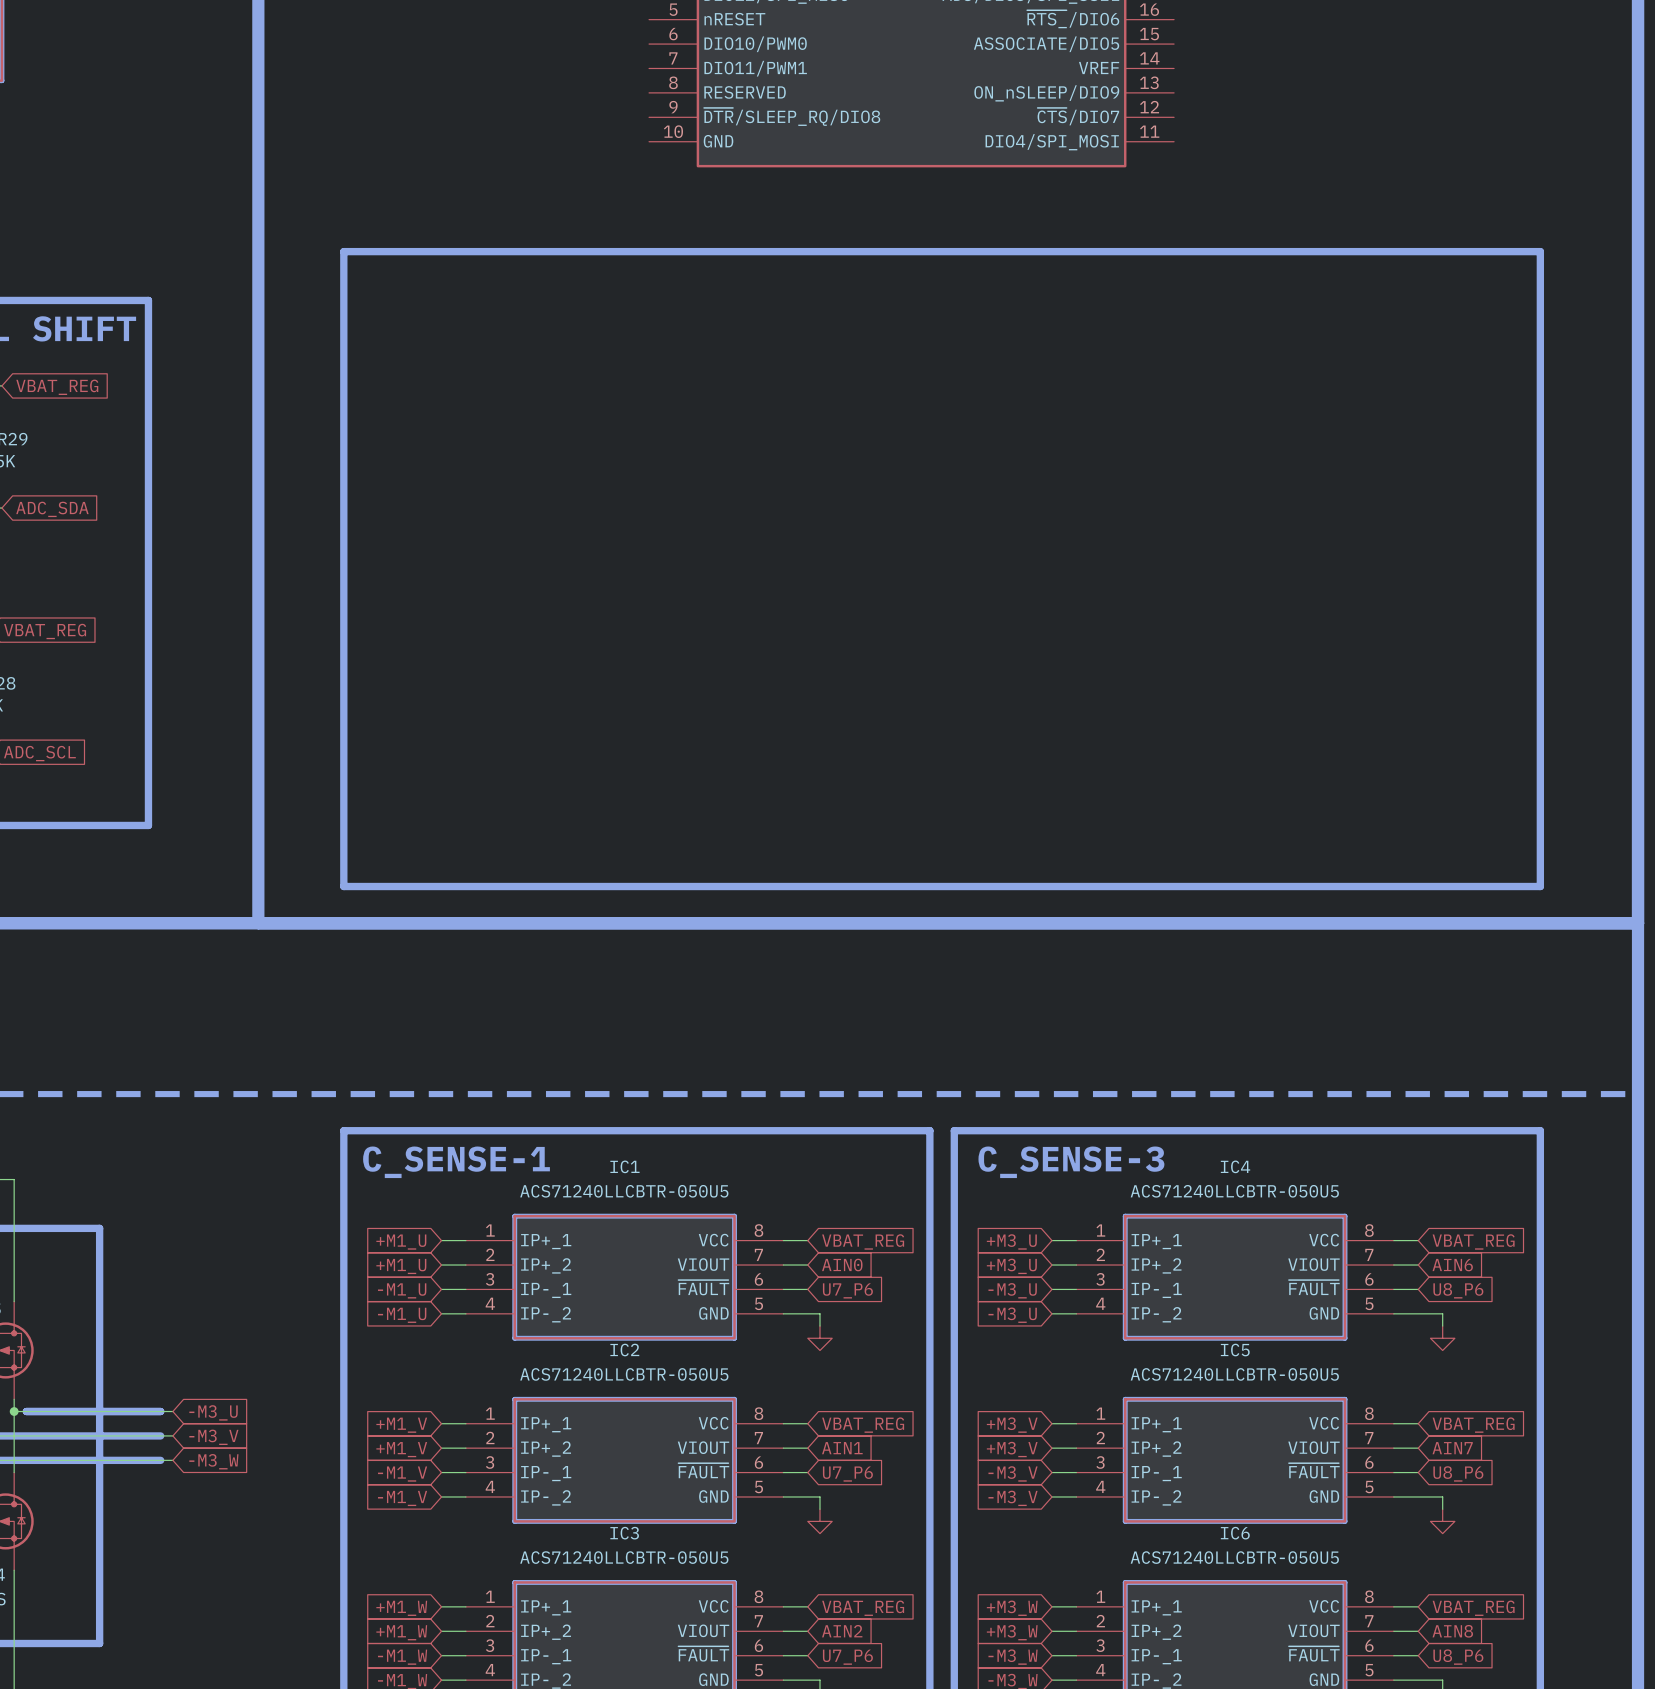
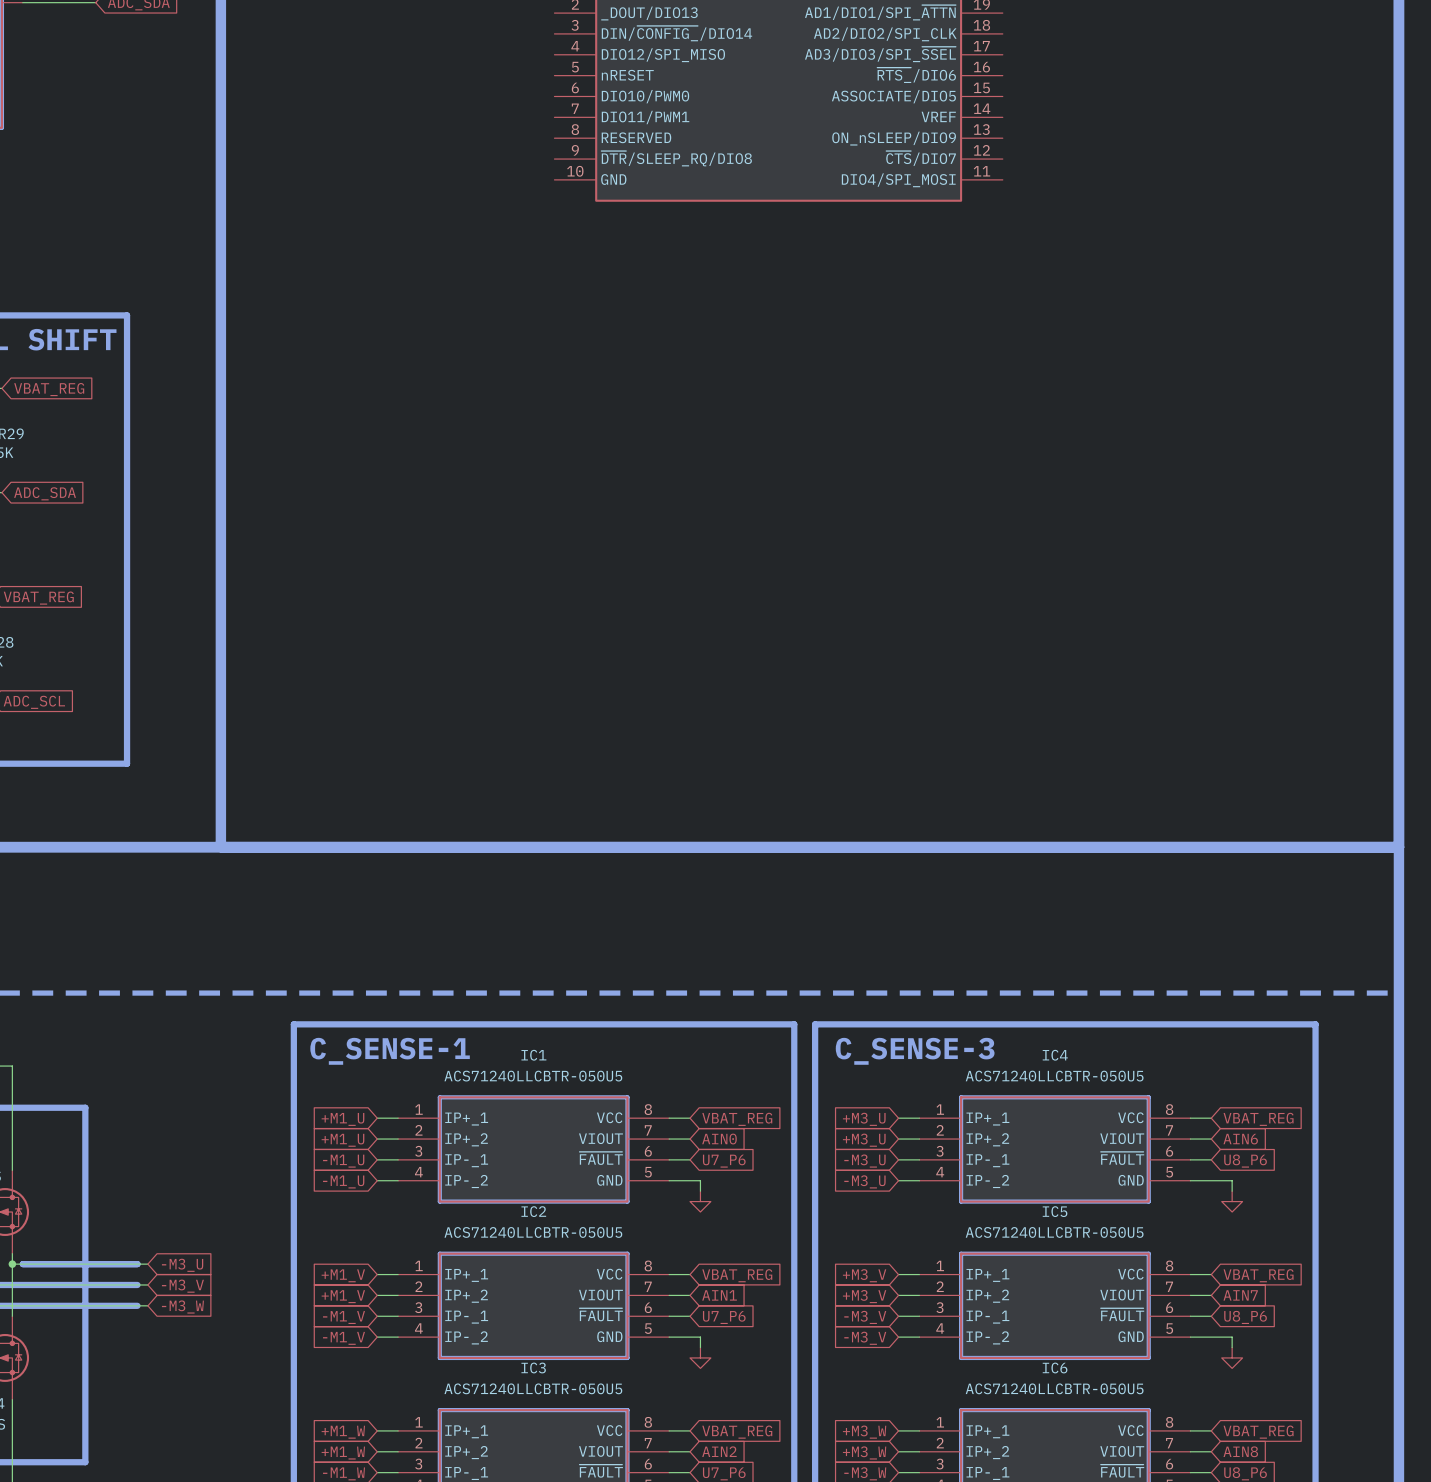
line: (343, 251) (1540, 251) (1540, 886) (343, 886) (343, 251) -> none

